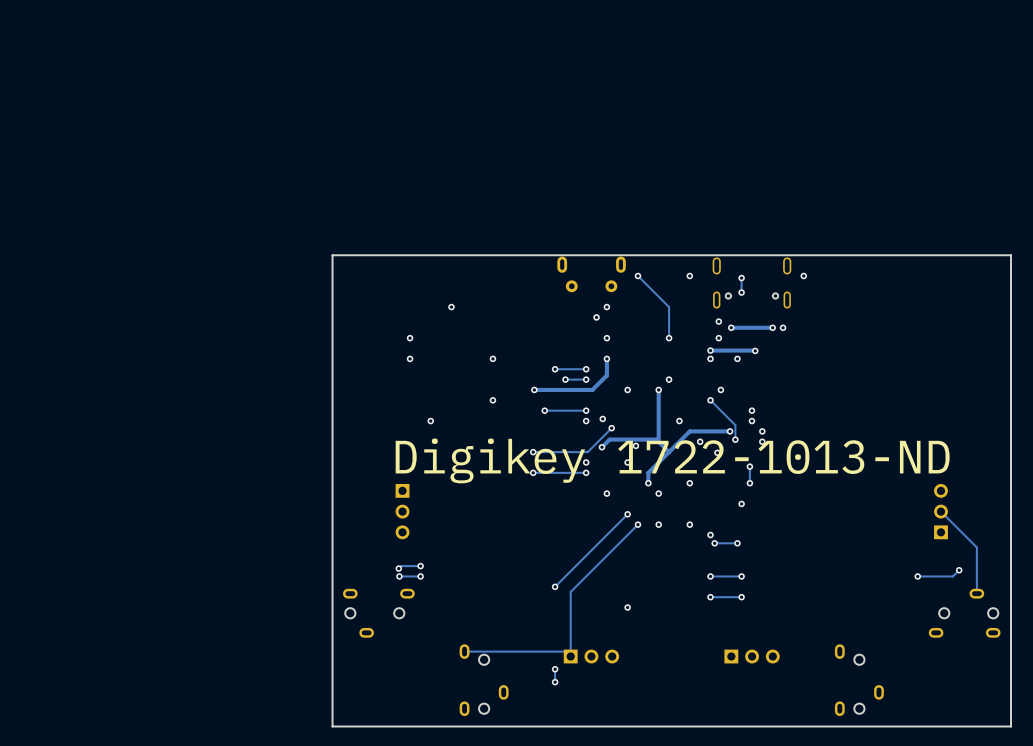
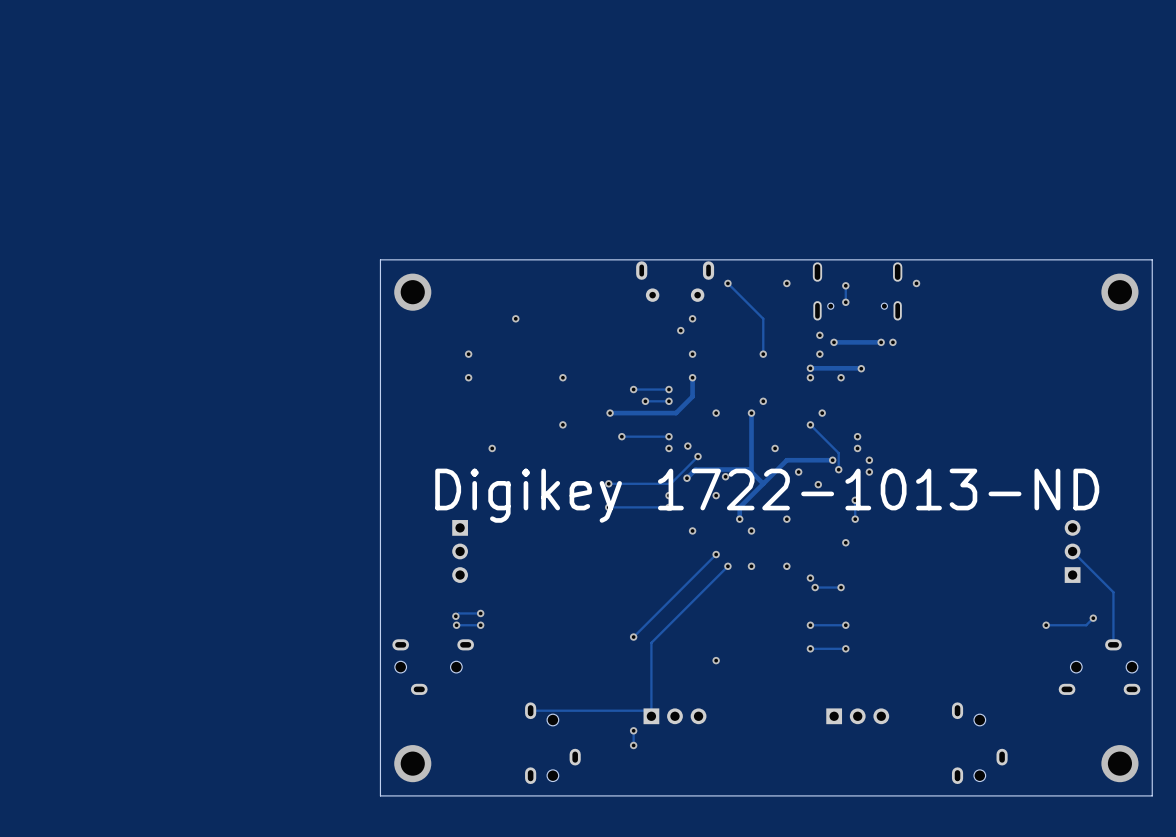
via: none -> (412, 292)
via: none -> (1119, 292)
via: none -> (412, 763)
via: none -> (1119, 763)

